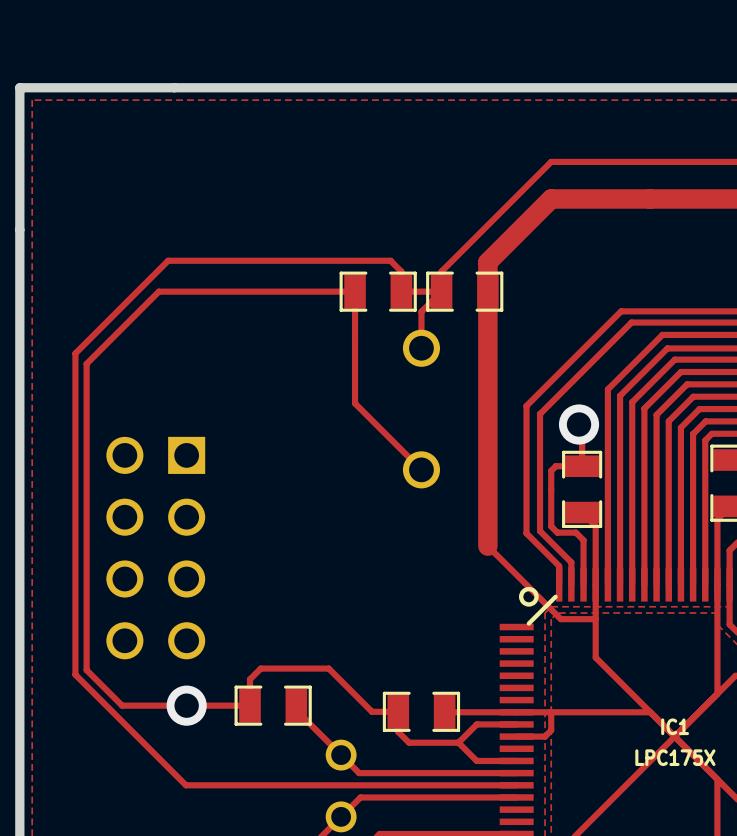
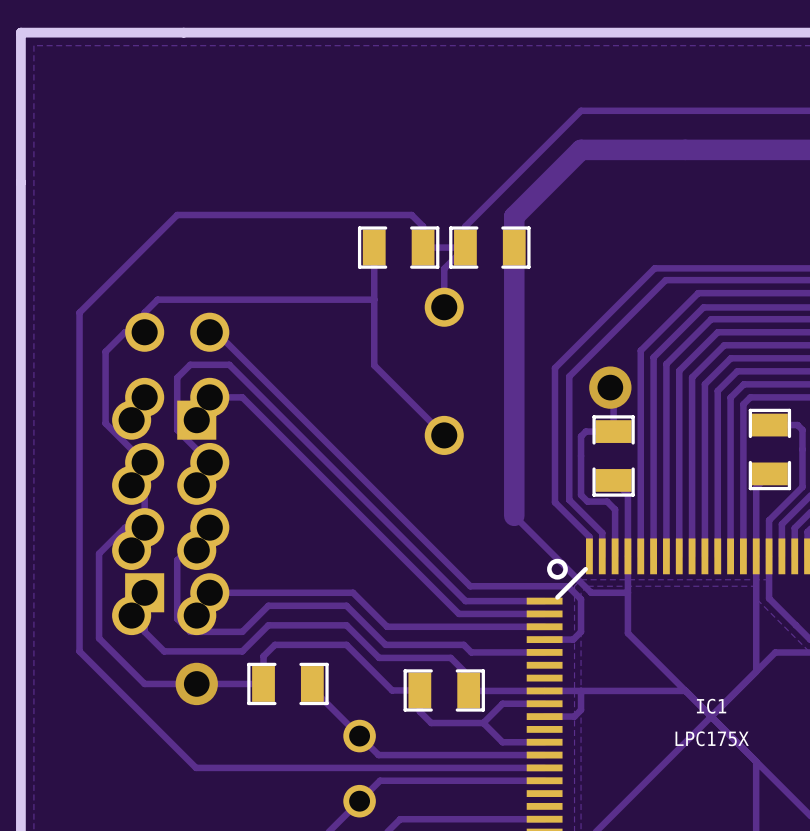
track: (355, 291) (158, 291) (86, 363) (86, 670) (122, 705) (137, 705) -> (374, 299) (157, 299) (144, 312) (144, 332) (125, 332) (105, 351) (105, 423) (144, 462) (144, 527) (125, 527) (99, 553) (99, 638) (144, 683)
track: none -> (209, 332) (216, 332) (470, 586) (568, 586) (581, 599) (581, 631) (573, 639) (544, 639)
track: none -> (209, 397) (242, 397) (458, 613) (544, 613)
part: none -> (177, 462)
track: none -> (209, 462) (177, 429) (177, 377) (190, 364) (229, 364) (465, 601) (544, 601)
track: none -> (209, 527) (177, 560) (177, 618) (190, 631) (242, 631) (268, 605) (346, 605) (385, 644) (463, 644) (471, 652) (544, 652)
track: none -> (144, 592) (144, 631) (164, 651) (242, 651) (268, 625) (346, 625) (379, 657) (450, 657) (468, 675) (468, 690)
track: none -> (209, 592) (353, 592) (387, 626) (544, 626)

